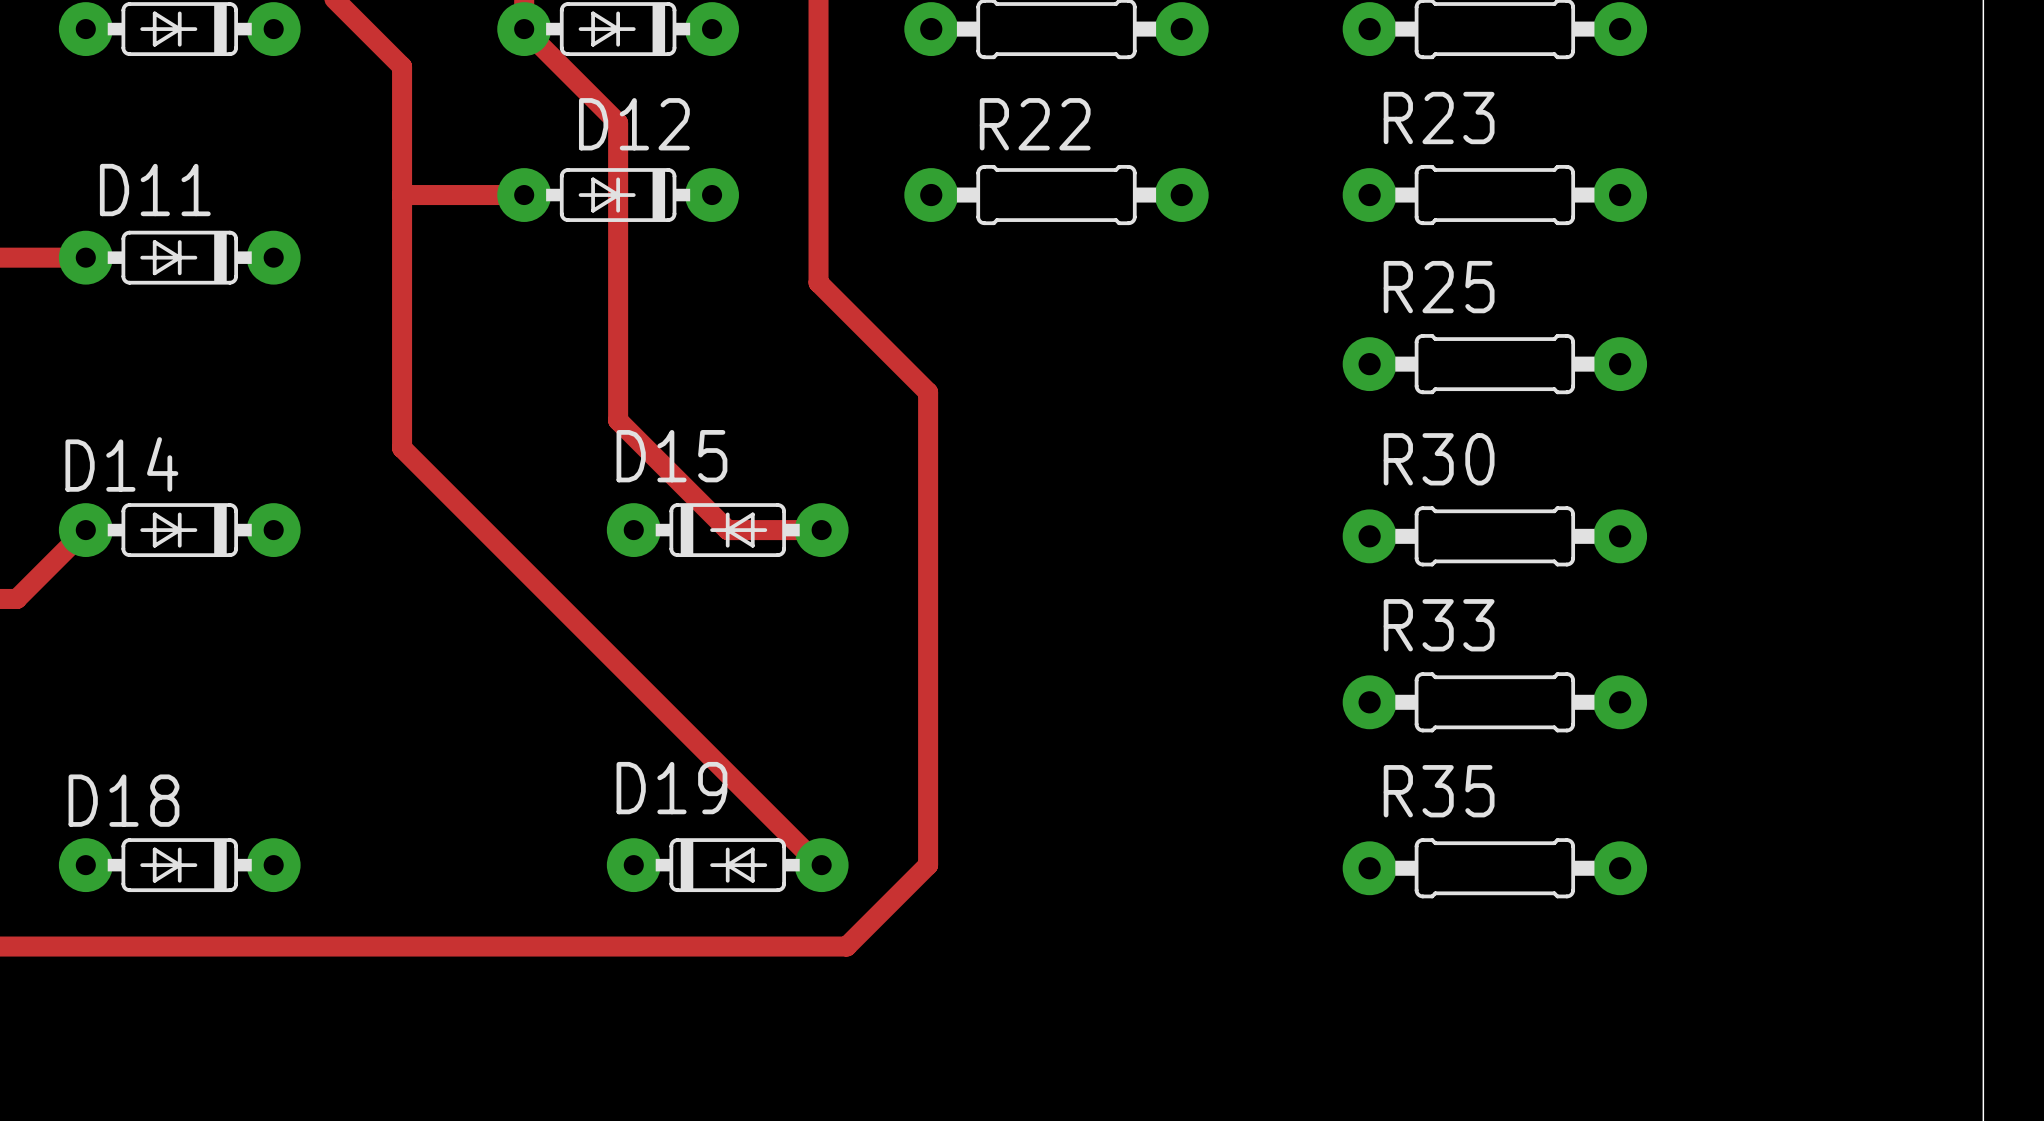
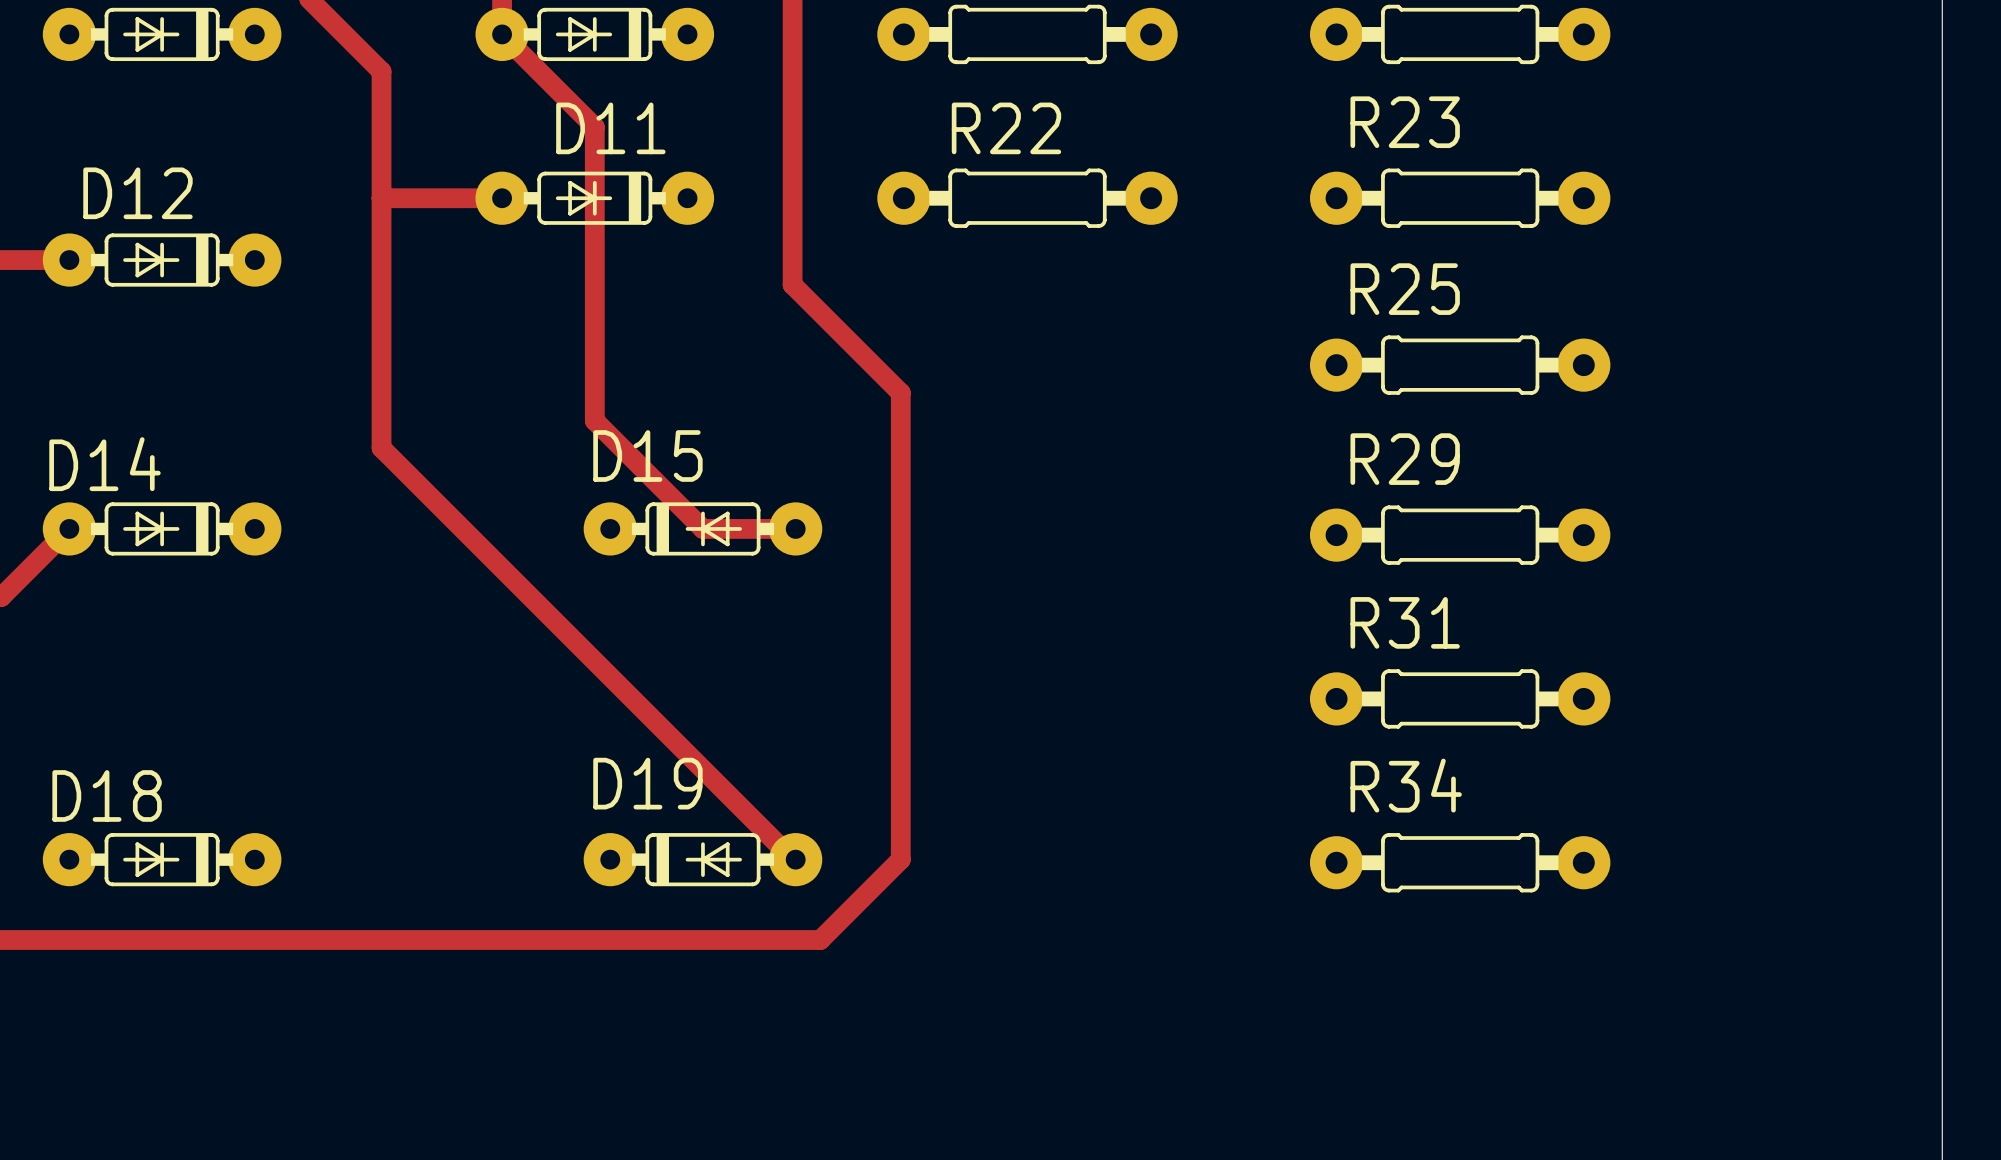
D12 name: D12 (634, 124) -> D11 (610, 128)
D11 name: D11 (155, 190) -> D12 (137, 193)
R30 name: R30 (1439, 459) -> R29 (1405, 459)
R33 name: R33 (1439, 625) -> R31 (1405, 622)
R35 name: R35 (1439, 791) -> R34 (1406, 785)

